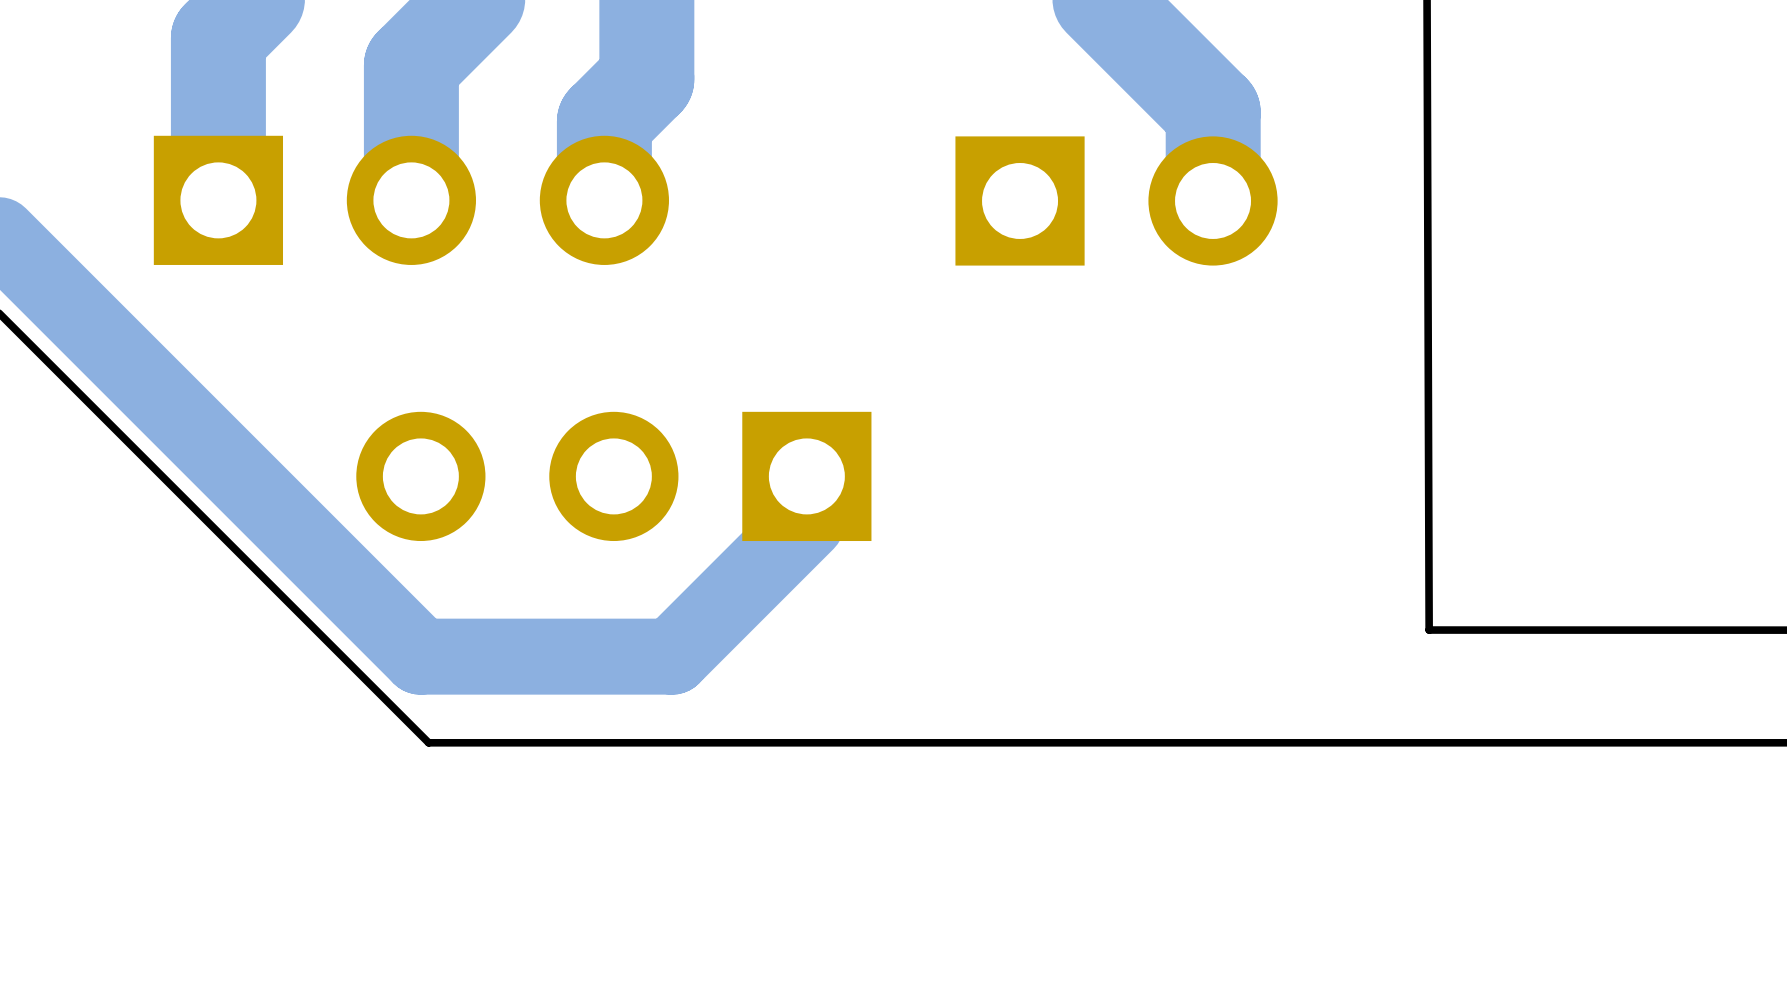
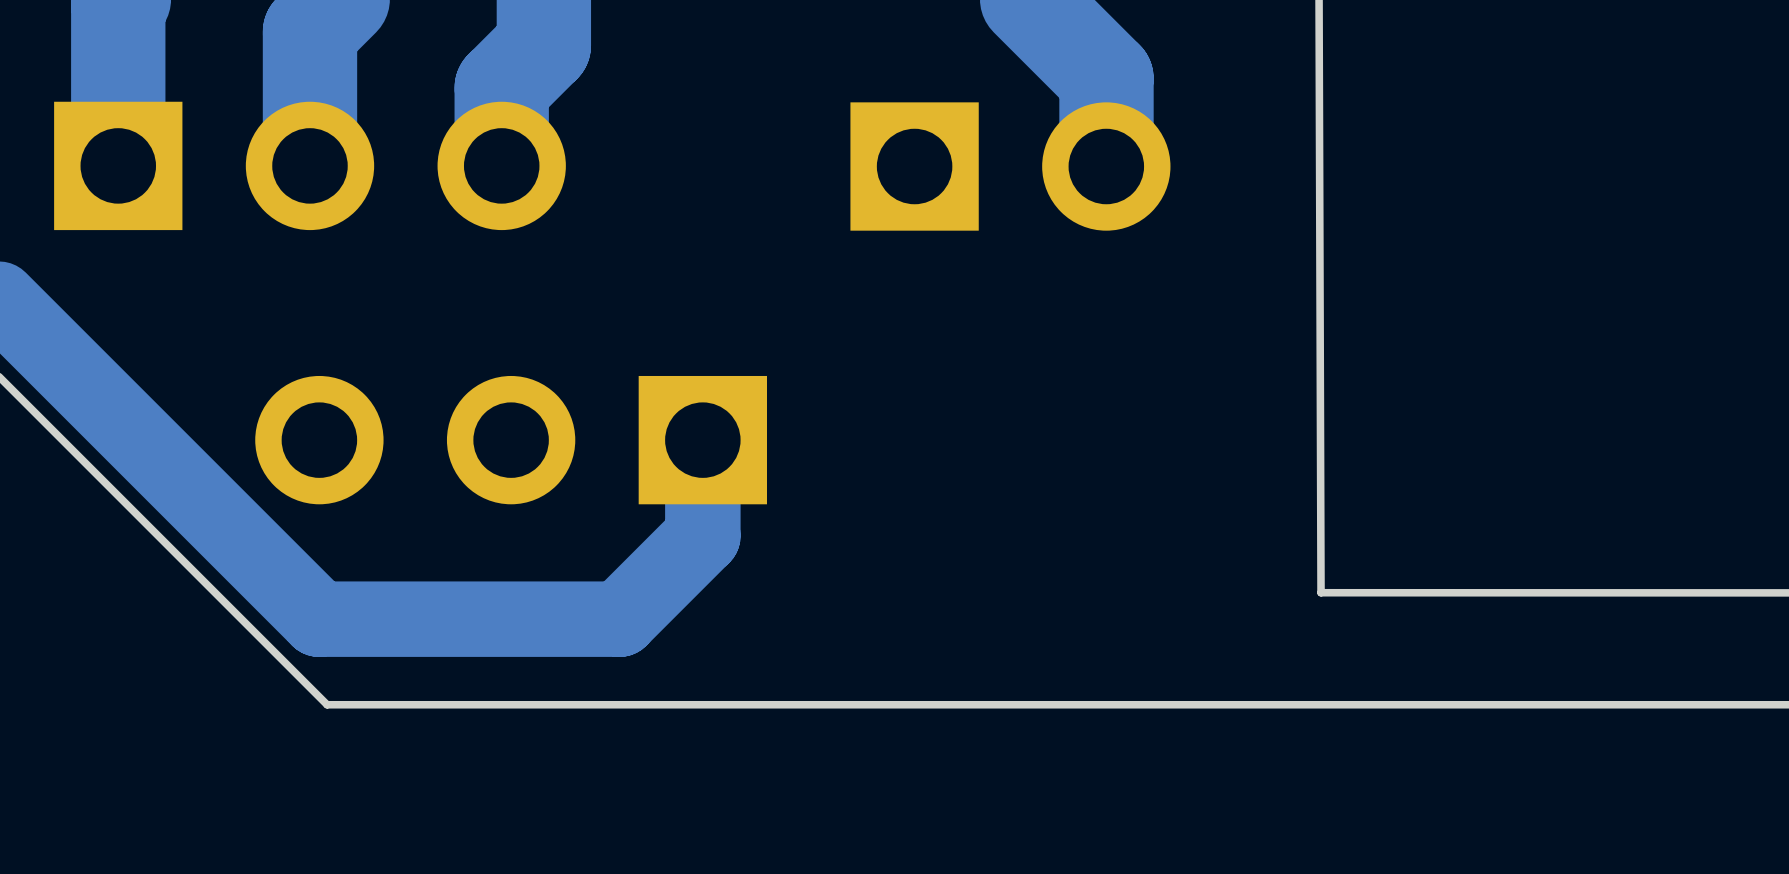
track: (806, 521) (672, 656) -> (702, 485) (702, 535) (619, 619) (569, 619)

